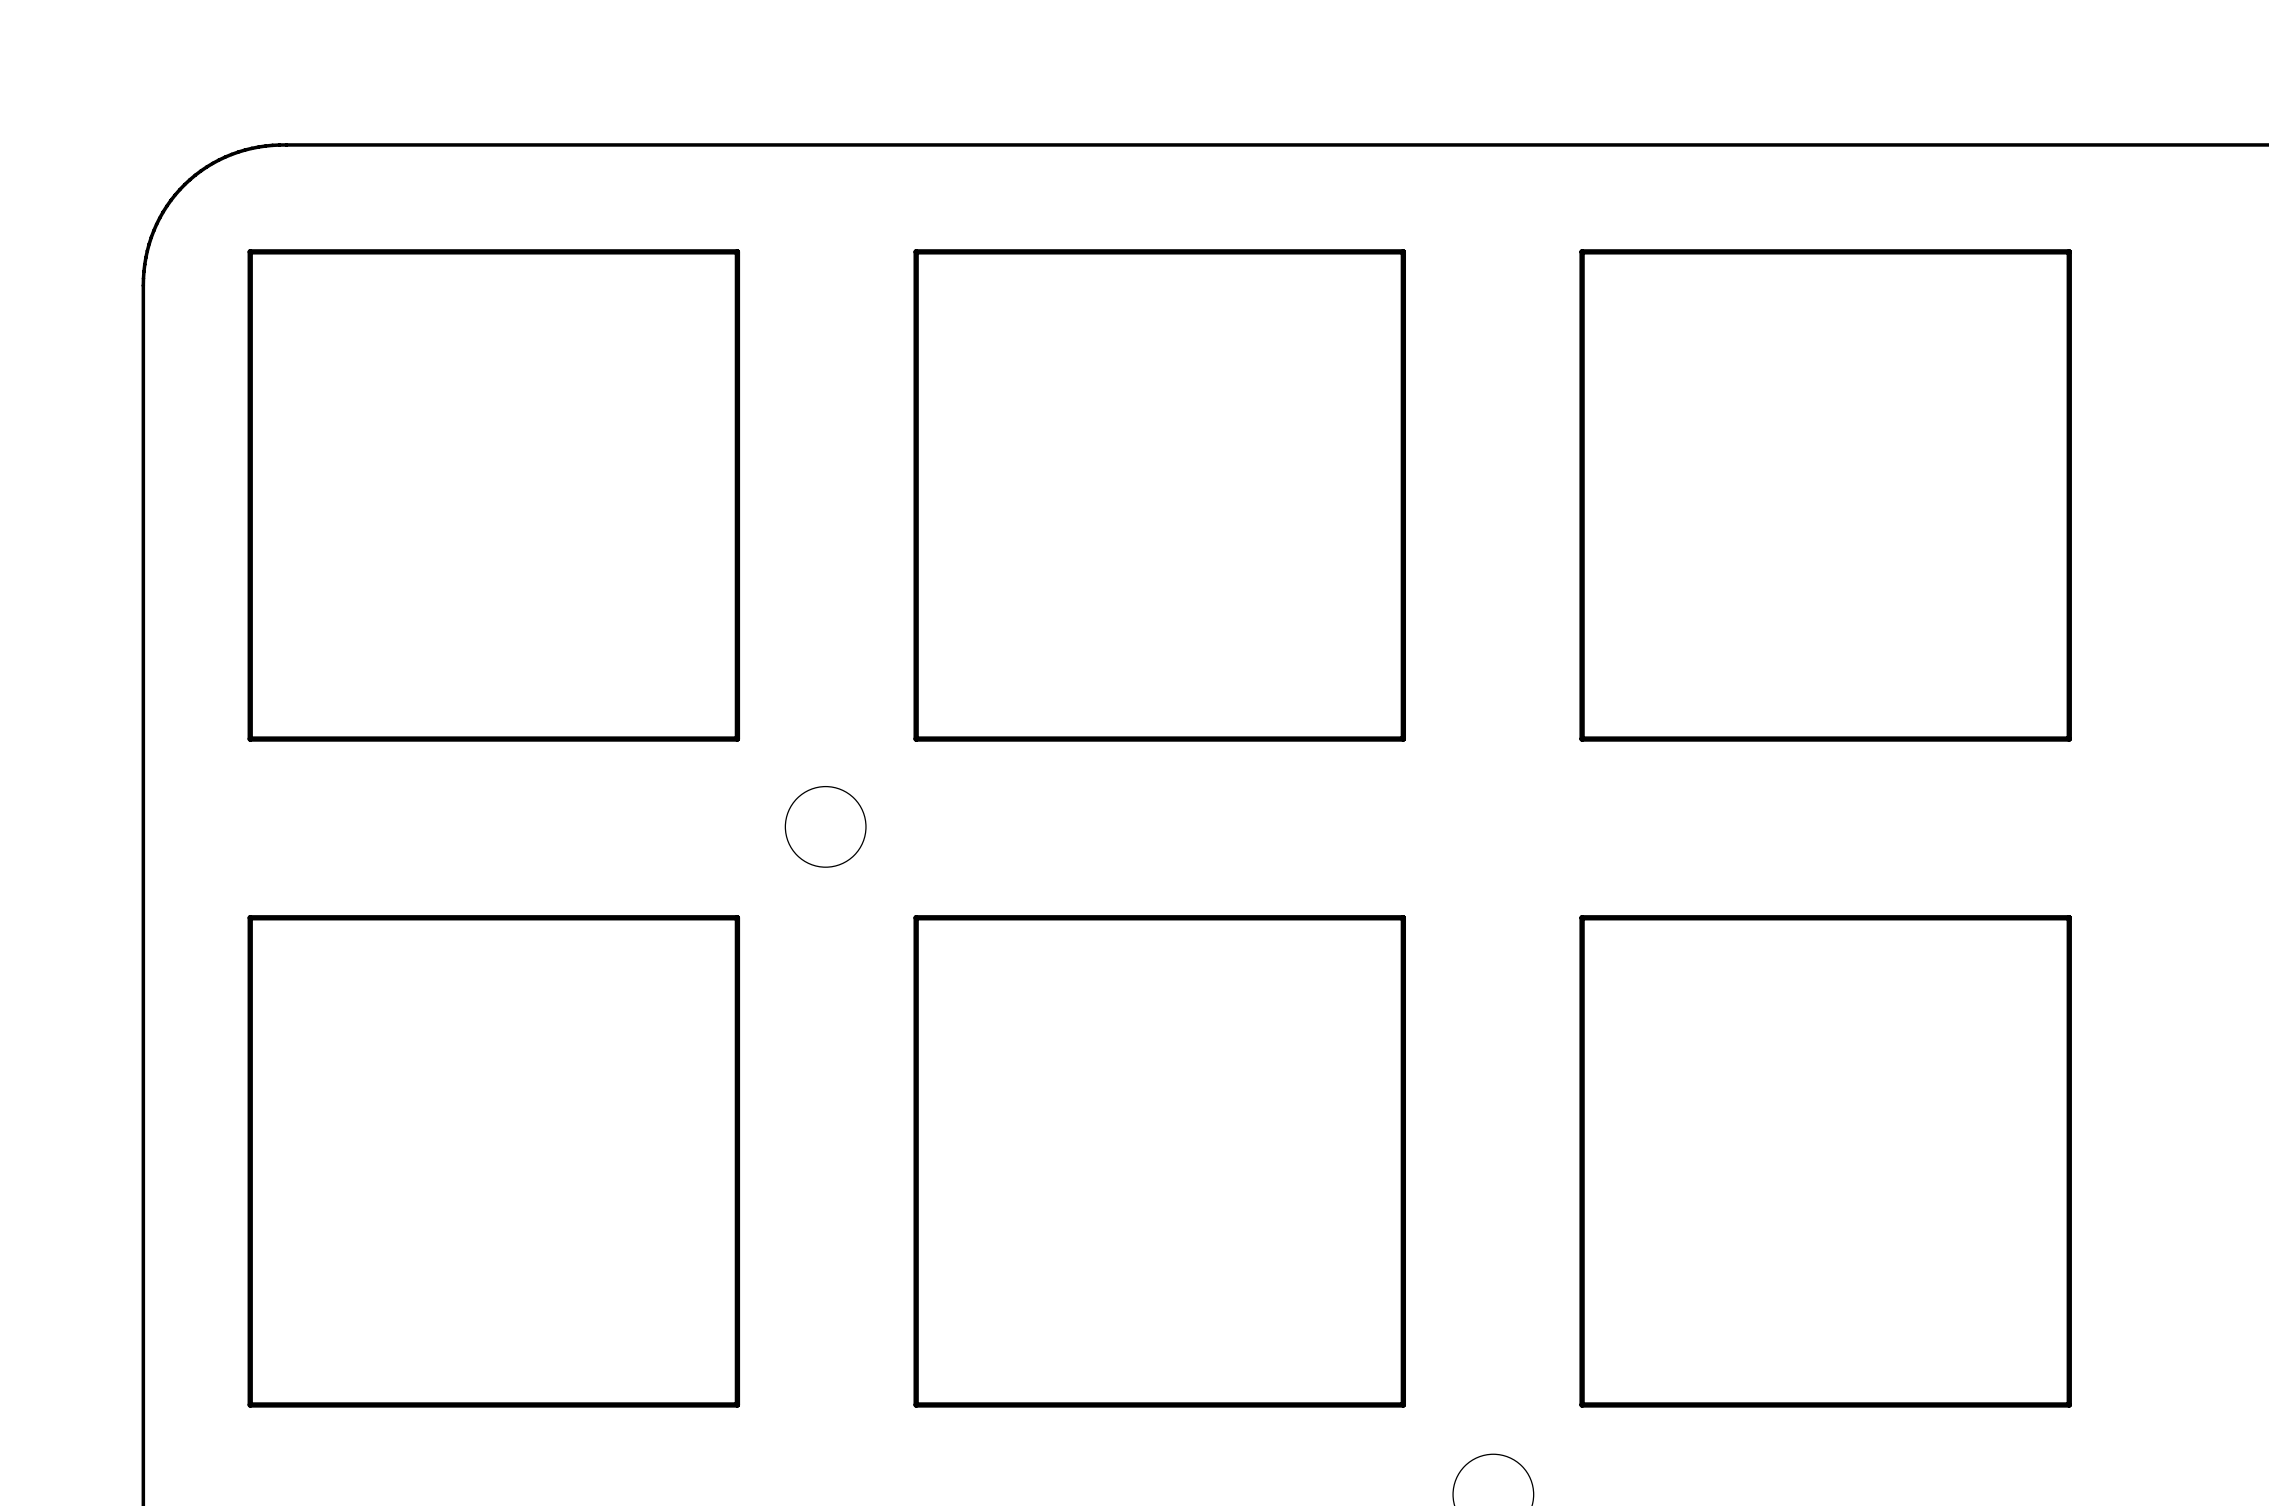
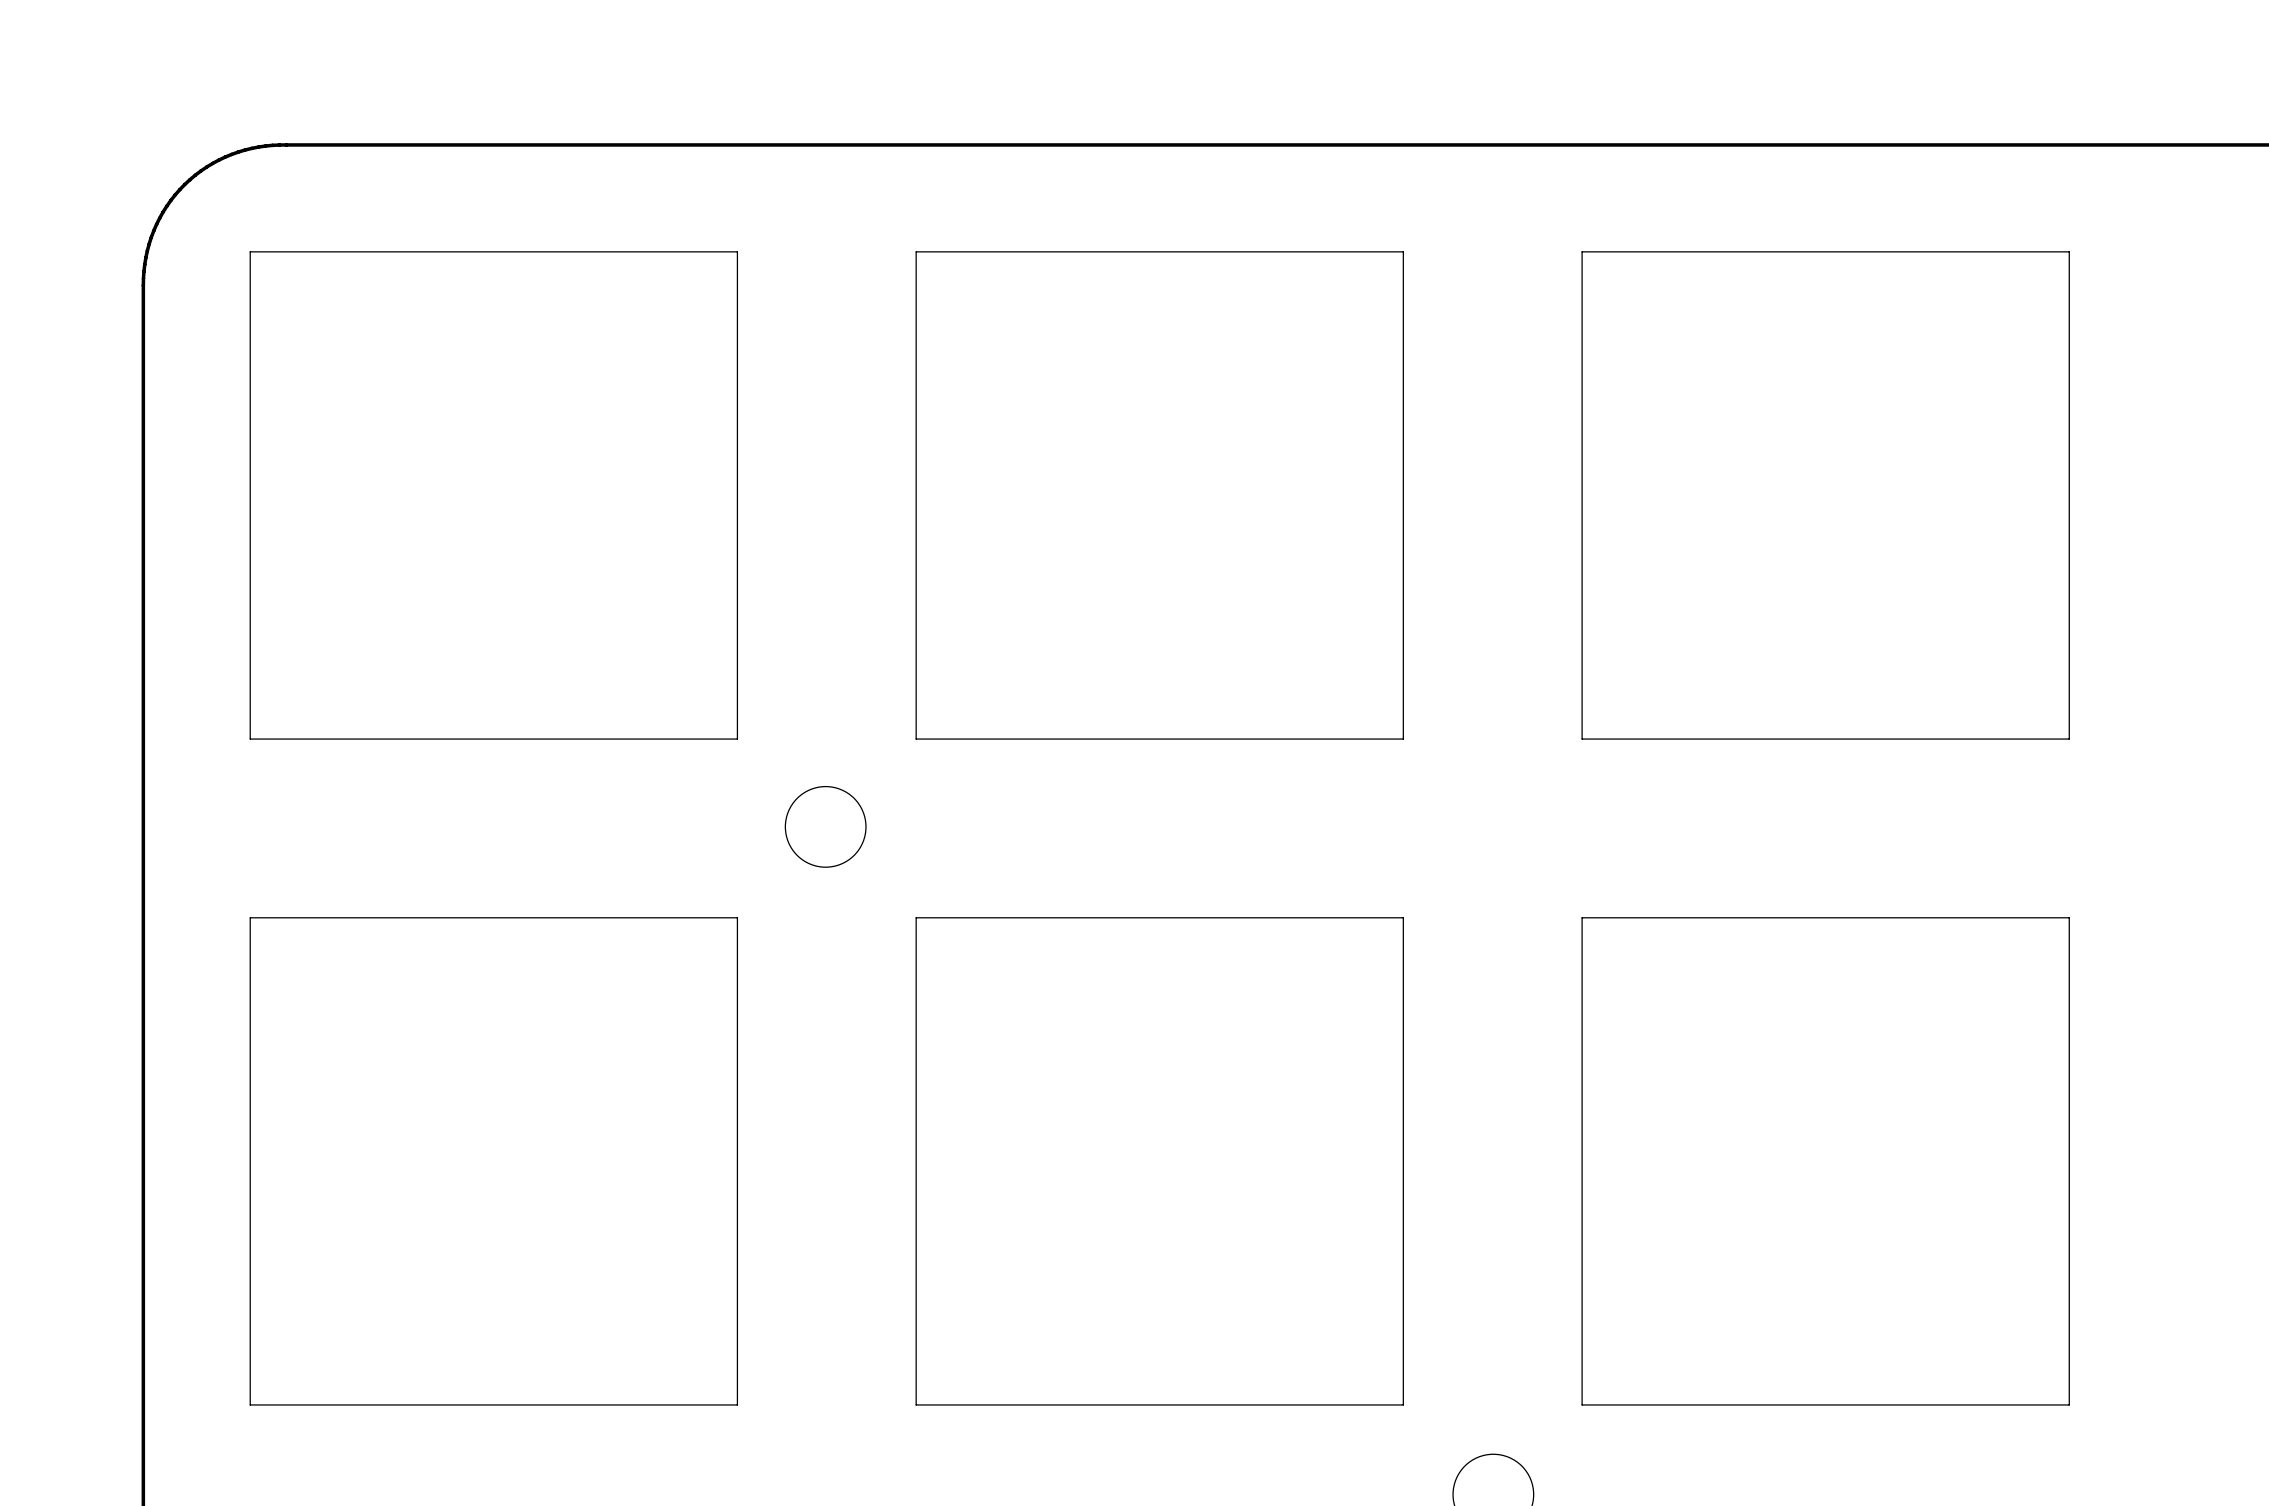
board edge width: thick (250, 251) (250, 739) (737, 739) (737, 251) (250, 251) -> thin (250, 251) (250, 739) (737, 739) (737, 251) (250, 251)
board edge width: thick (916, 251) (916, 739) (1403, 739) (1403, 251) (916, 251) -> thin (916, 251) (916, 739) (1403, 739) (1403, 251) (916, 251)
board edge width: thick (1582, 251) (1582, 739) (2069, 739) (2069, 251) (1582, 251) -> thin (1582, 251) (1582, 739) (2069, 739) (2069, 251) (1582, 251)
board edge width: thick (250, 917) (250, 1404) (737, 1404) (737, 917) (250, 917) -> thin (250, 917) (250, 1404) (737, 1404) (737, 917) (250, 917)
board edge width: thick (916, 917) (1403, 917) (1403, 1404) (916, 1404) (916, 917) -> thin (916, 917) (1403, 917) (1403, 1404) (916, 1404) (916, 917)
board edge width: thick (1582, 917) (2069, 917) (2069, 1404) (1582, 1404) (1582, 917) -> thin (1582, 917) (2069, 917) (2069, 1404) (1582, 1404) (1582, 917)

